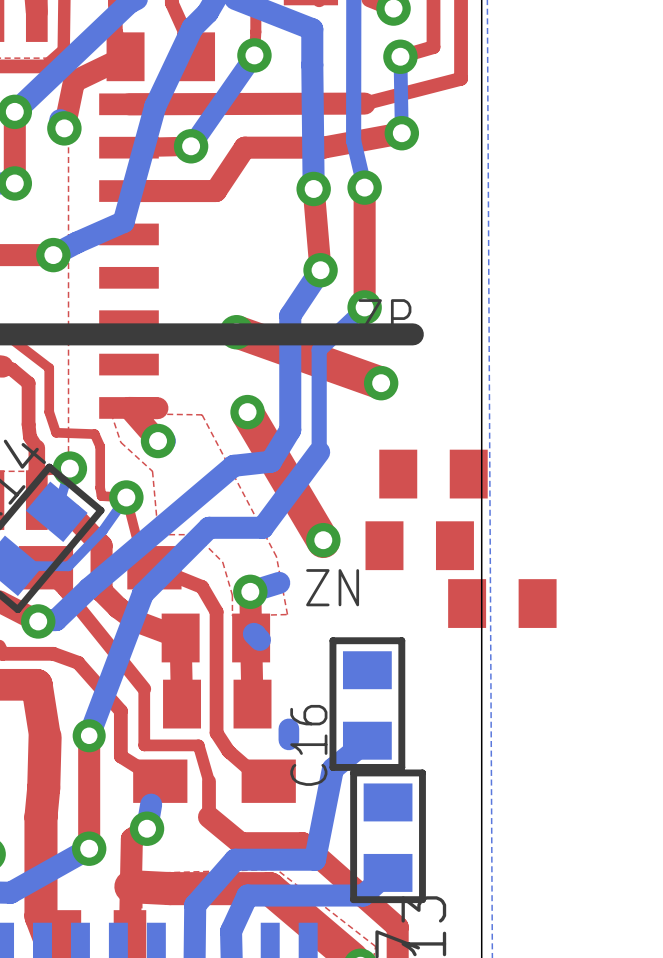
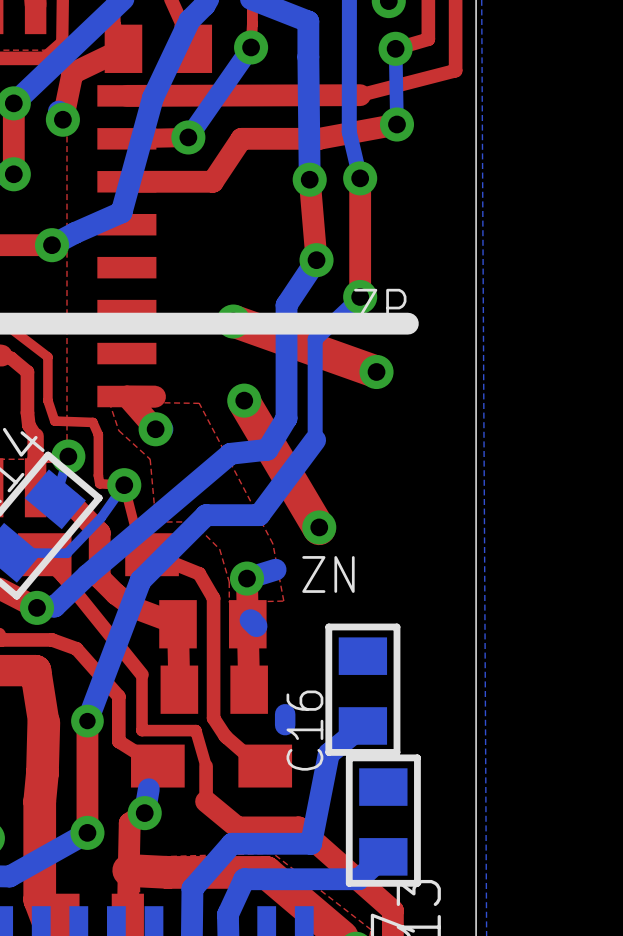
part: (433, 474) -> none
part: (419, 545) -> none
part: (502, 603) -> none

